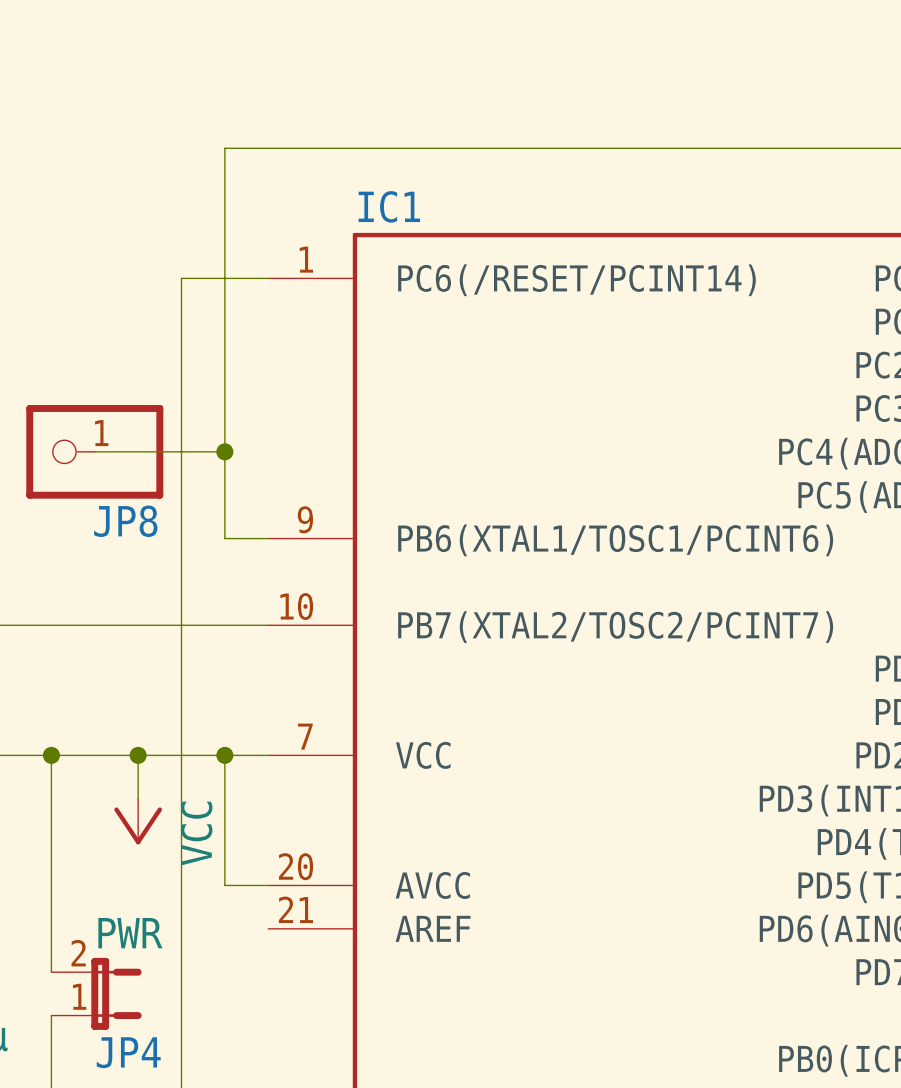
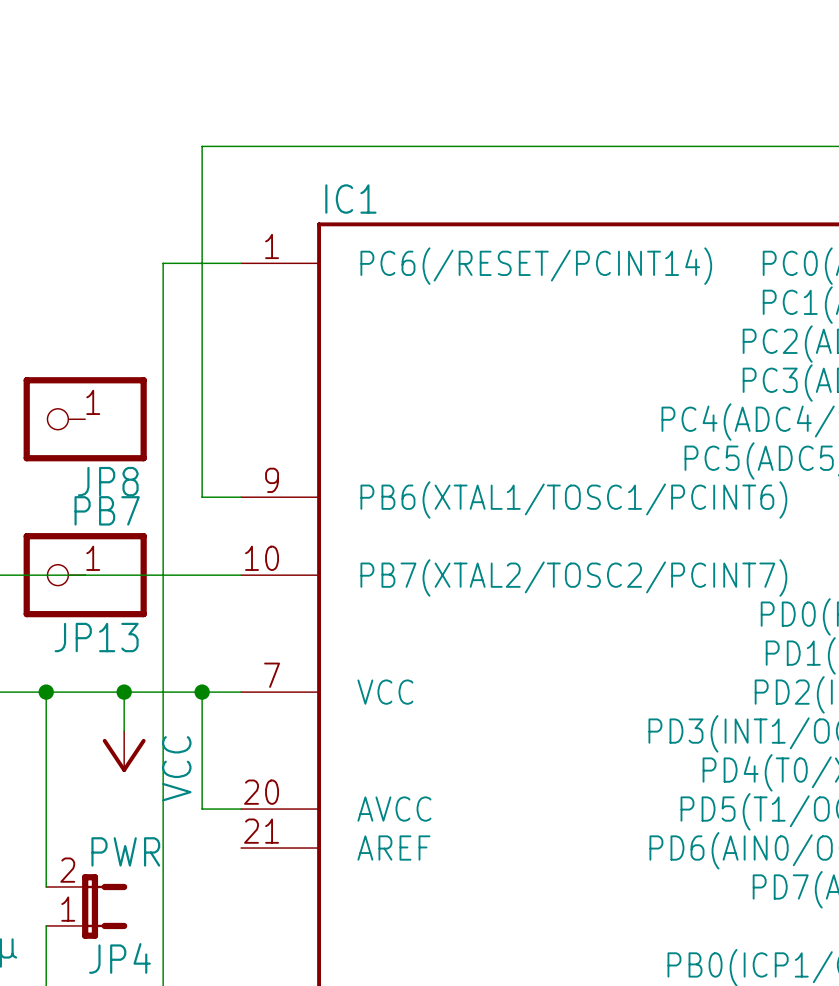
wire: (94, 451) (224, 451) -> none
junction: (224, 451) -> none
JP13: none -> PB7 (85, 575)

